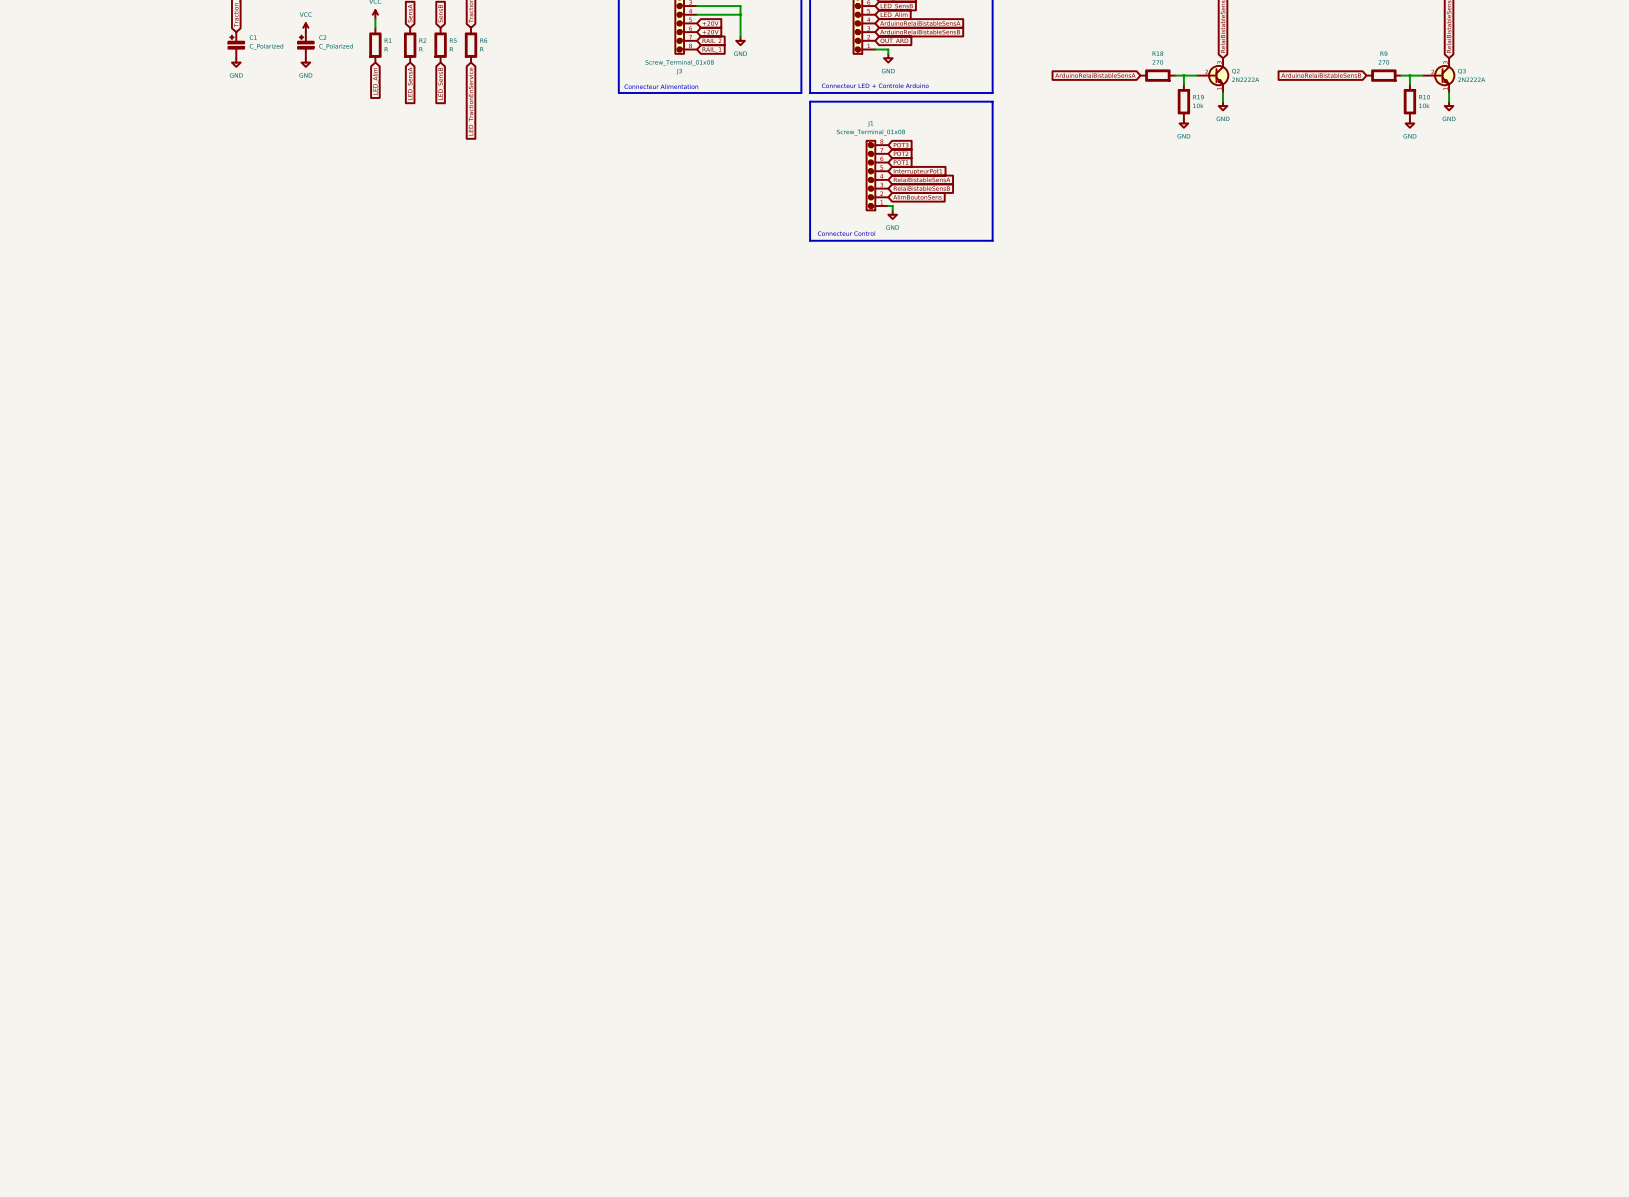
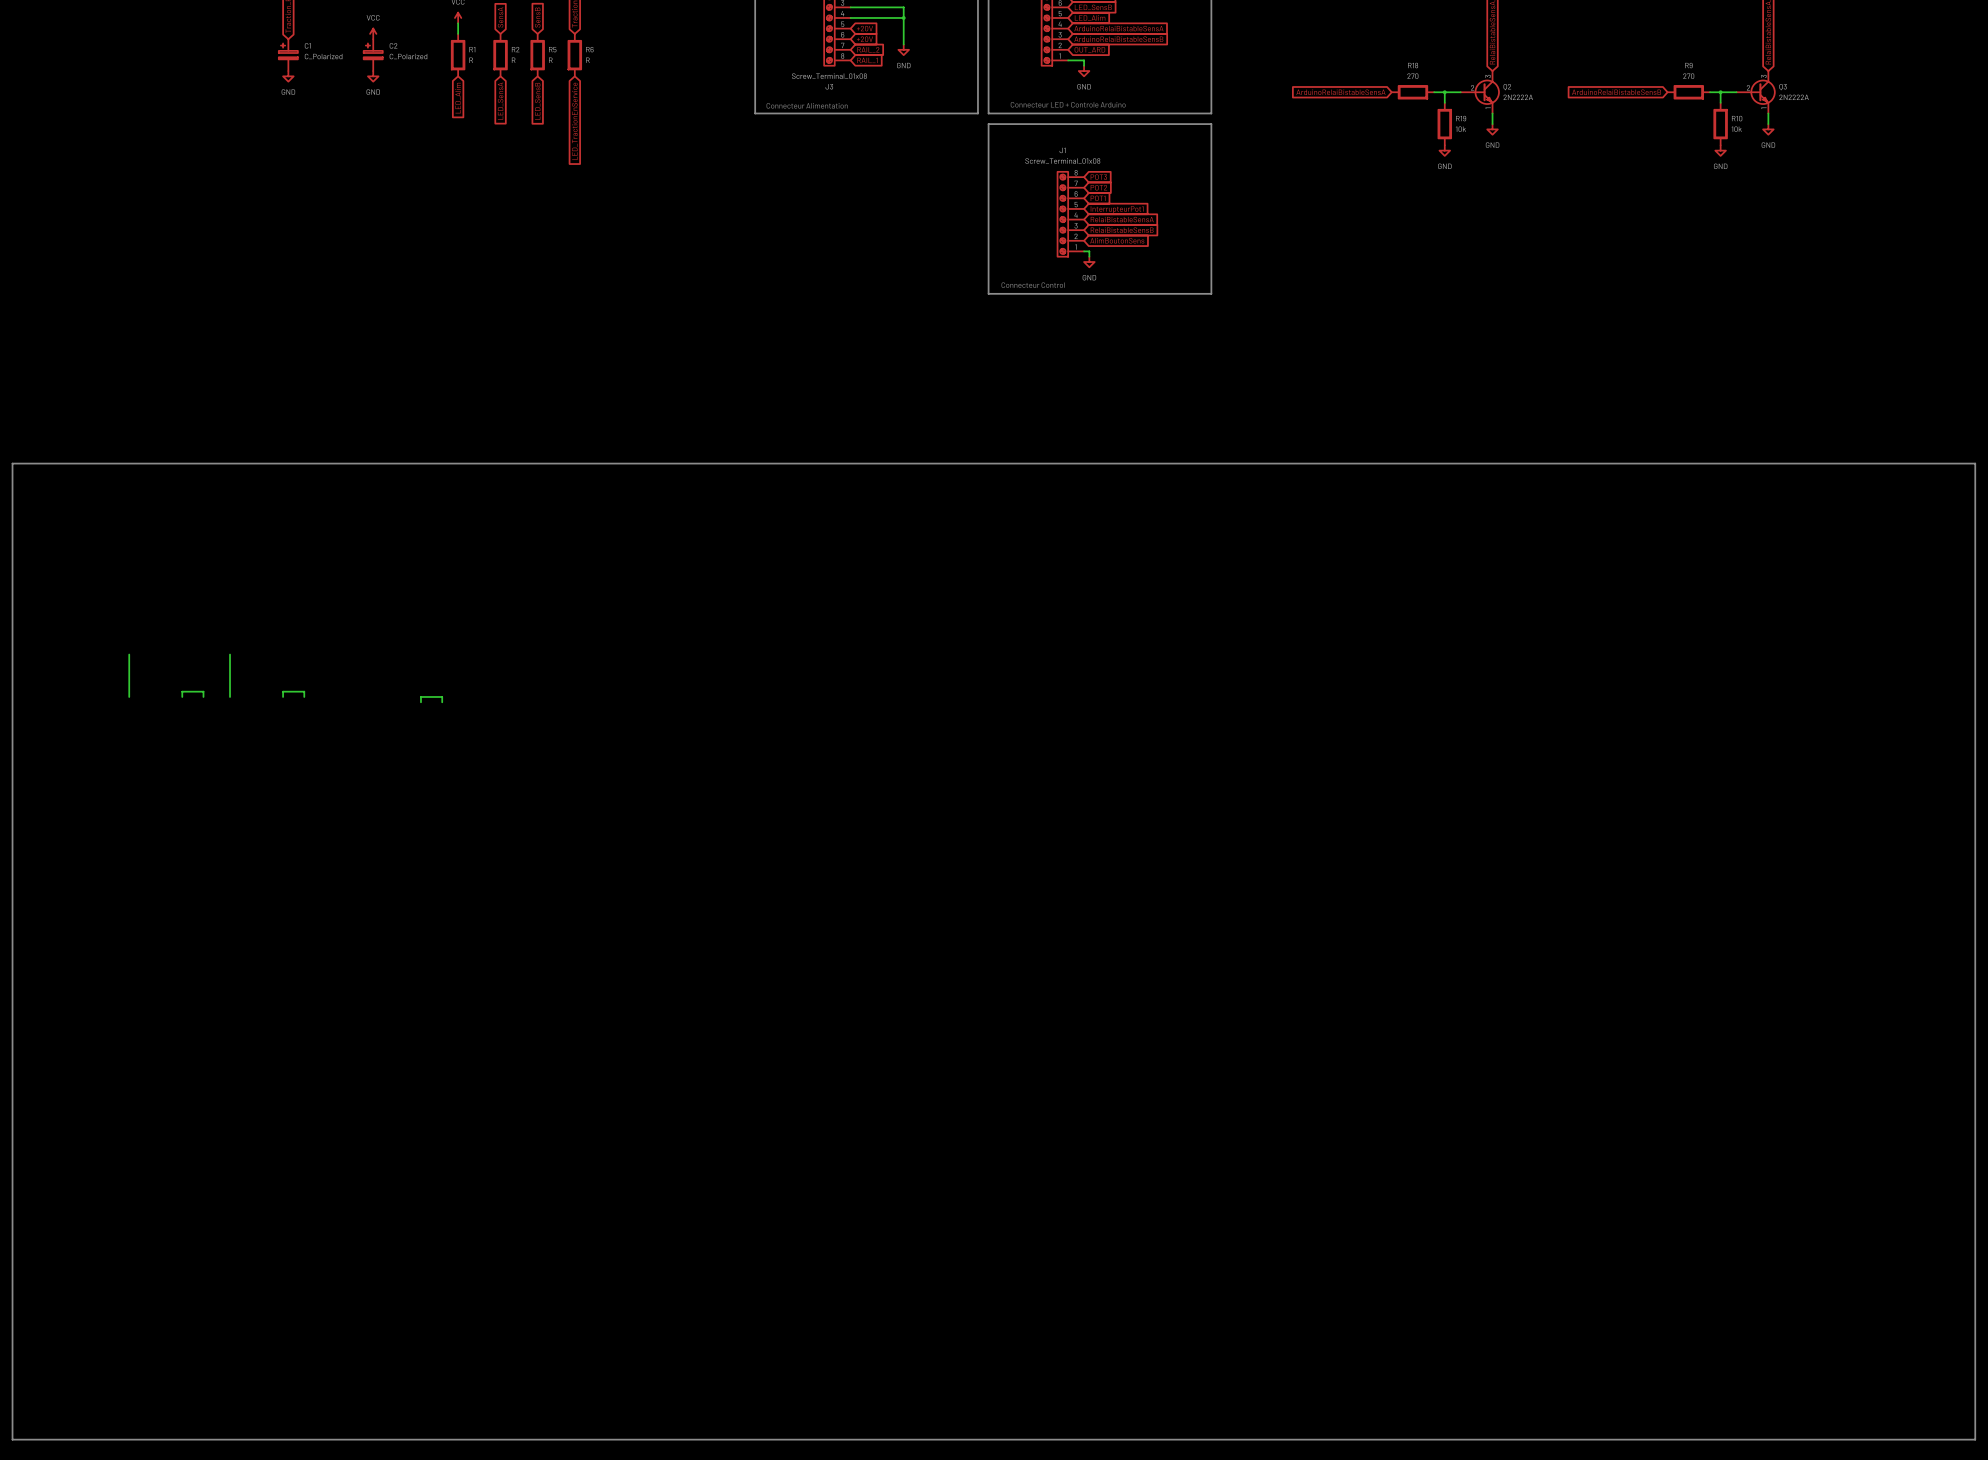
line: none -> (12, 463) (1975, 463) (1975, 1439) (12, 1439) (12, 463)
wire: none -> (129, 654) (129, 696)
wire: none -> (230, 654) (230, 696)
wire: none -> (182, 696) (182, 691) (203, 691) (203, 696)
wire: none -> (283, 696) (283, 691) (304, 691) (304, 696)
wire: none -> (420, 702) (420, 696) (442, 696) (442, 702)

